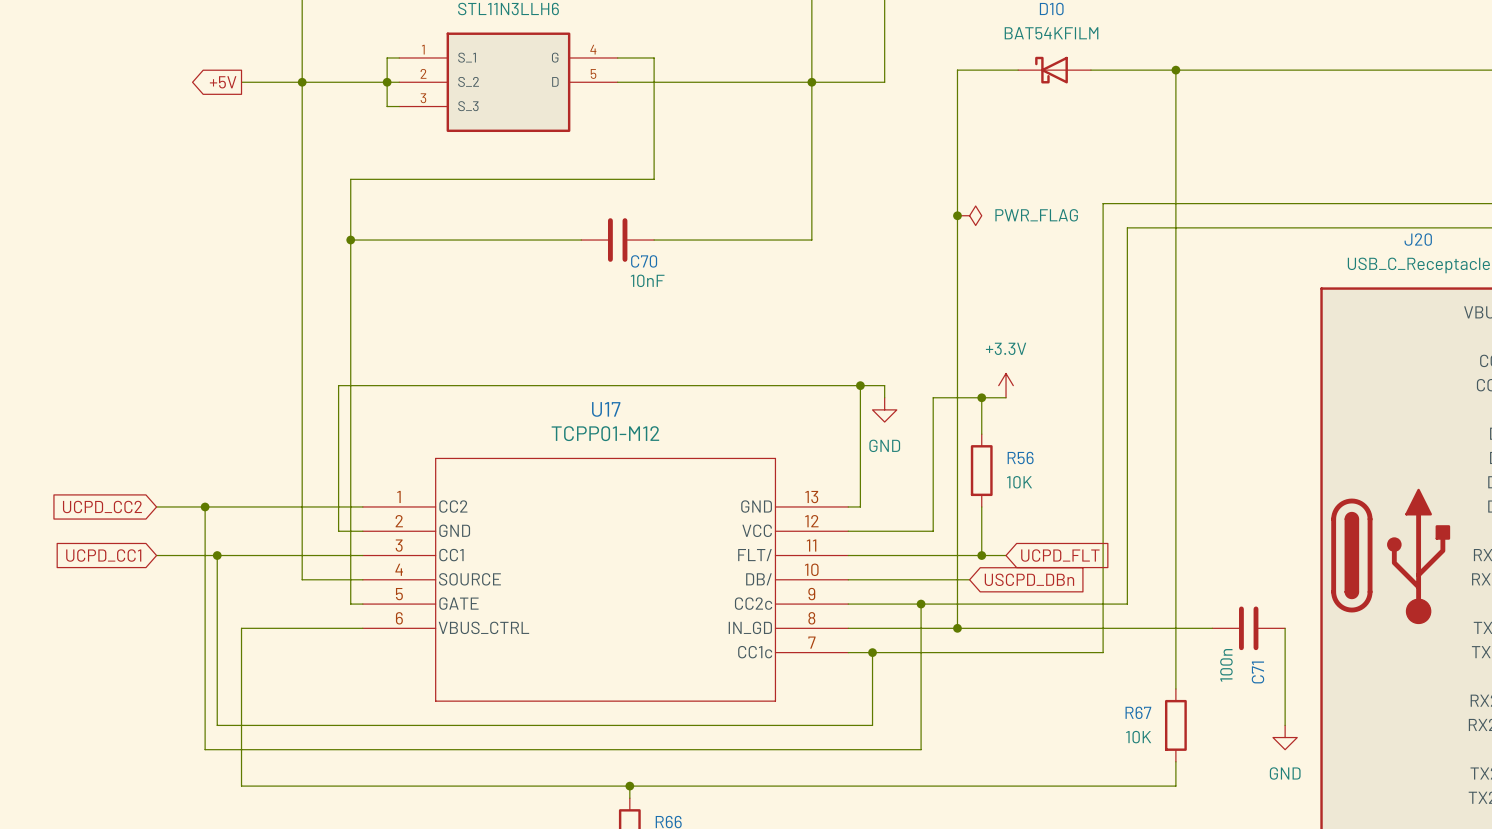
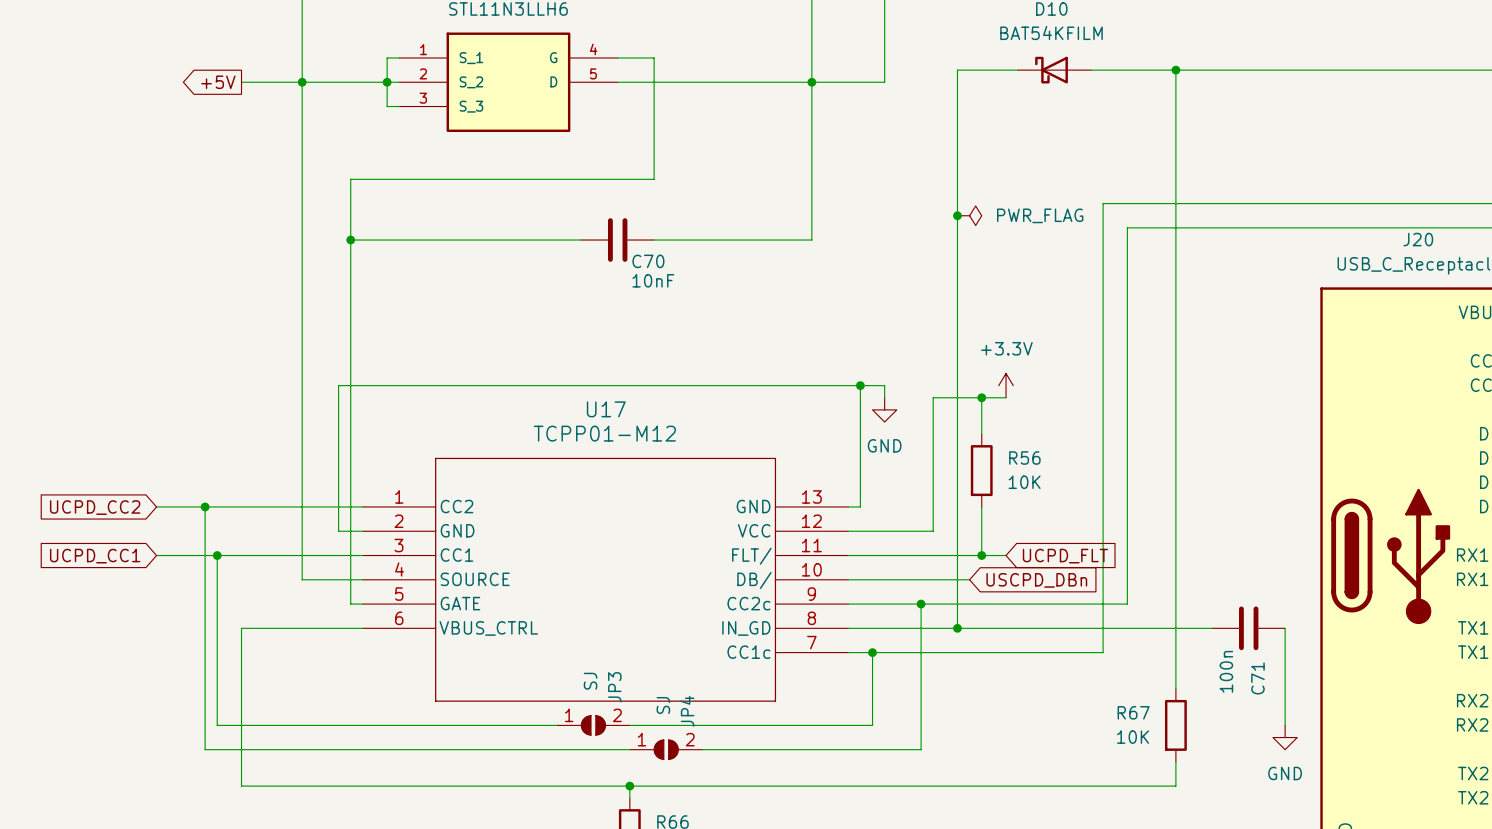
JP3: none -> SJ (593, 725)
JP4: none -> SJ (666, 749)

